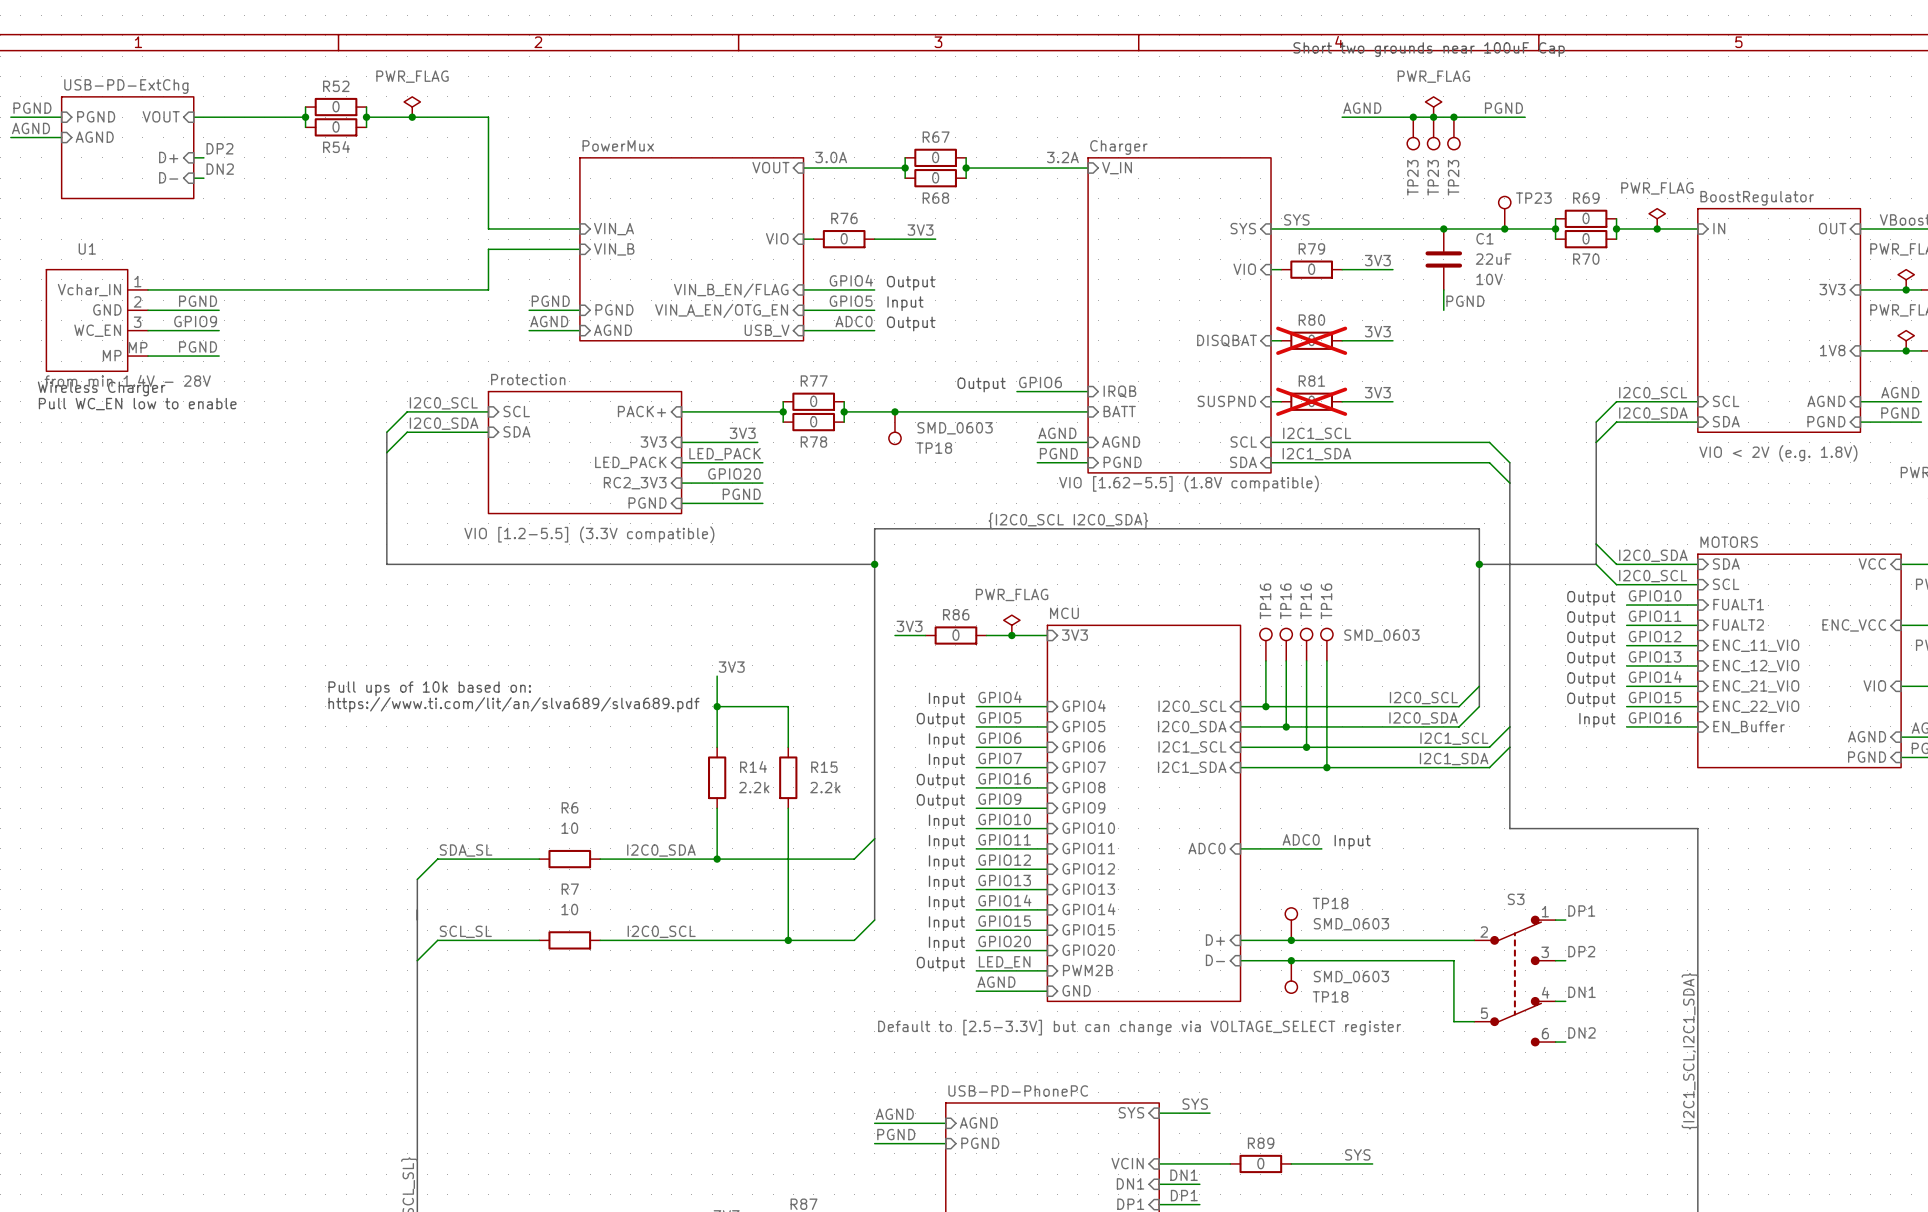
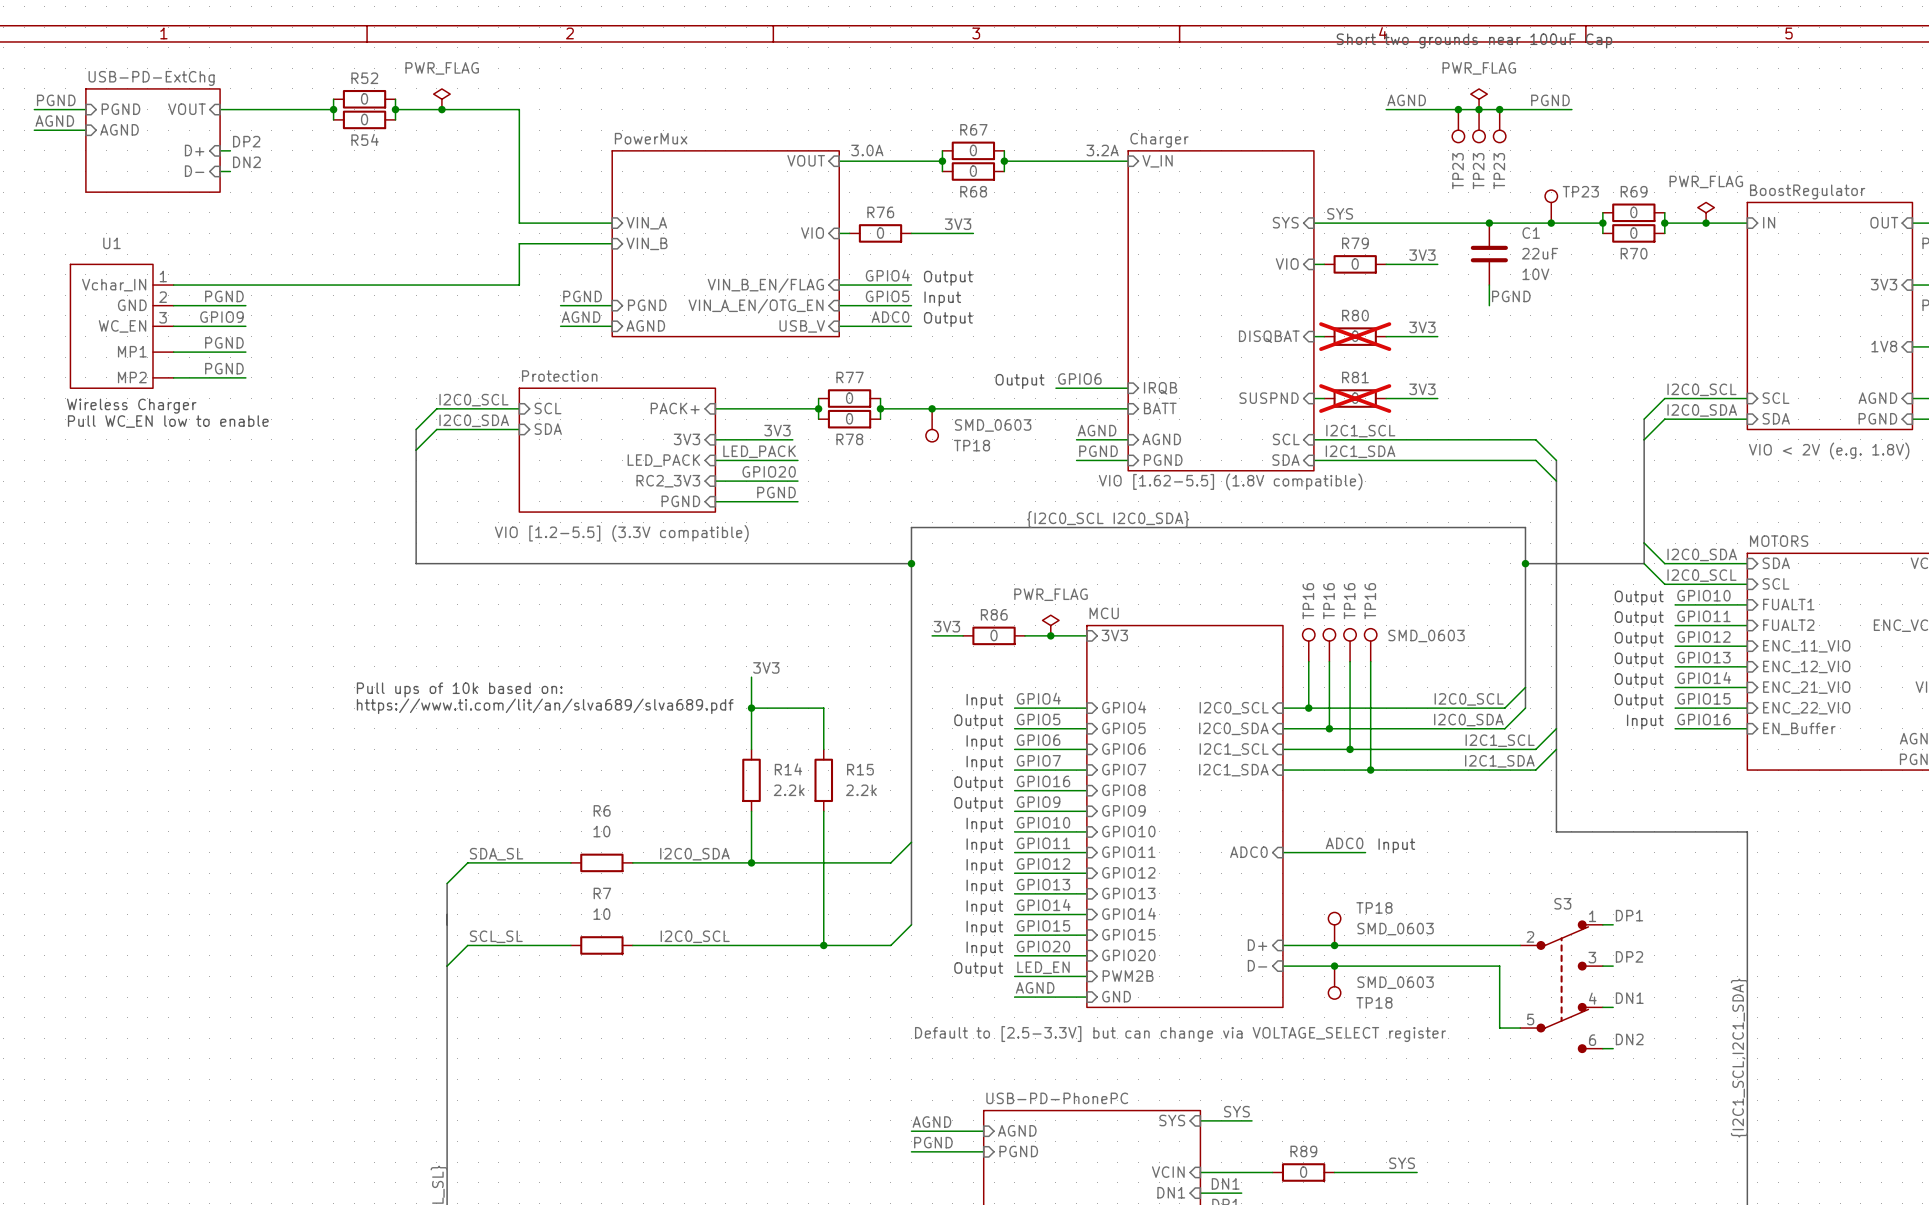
U1 symbol: [46, 269, 149, 372] -> [70, 264, 174, 389]
label: none -> PGND (224, 368)
U1 text: from min 1.4V - 28V (127, 380) -> none
wire: none -> (173, 377) (245, 377)
text: Wireless Charger (101, 388) -> none
text: Pull WC_EN low to enable (137, 404) -> Wireless Charger (131, 406)
text: none -> Pull WC_EN low to enable (168, 421)

